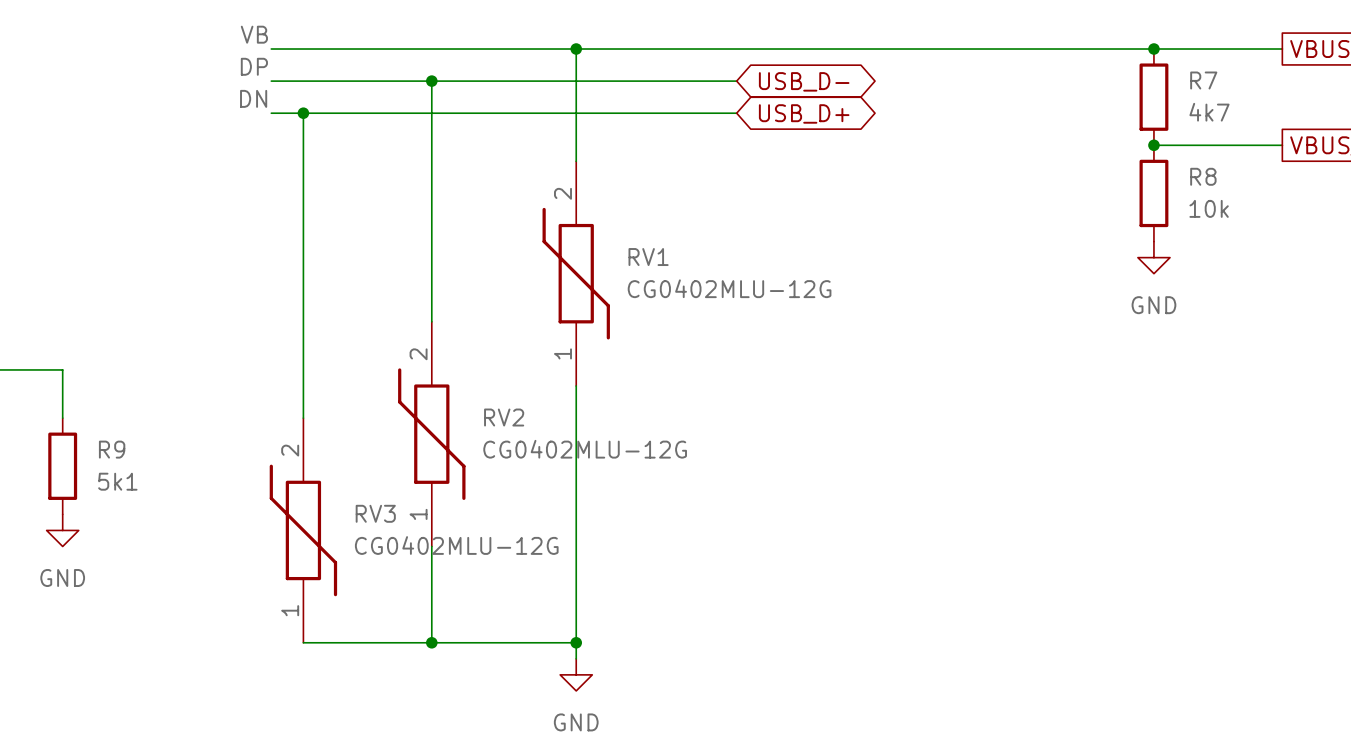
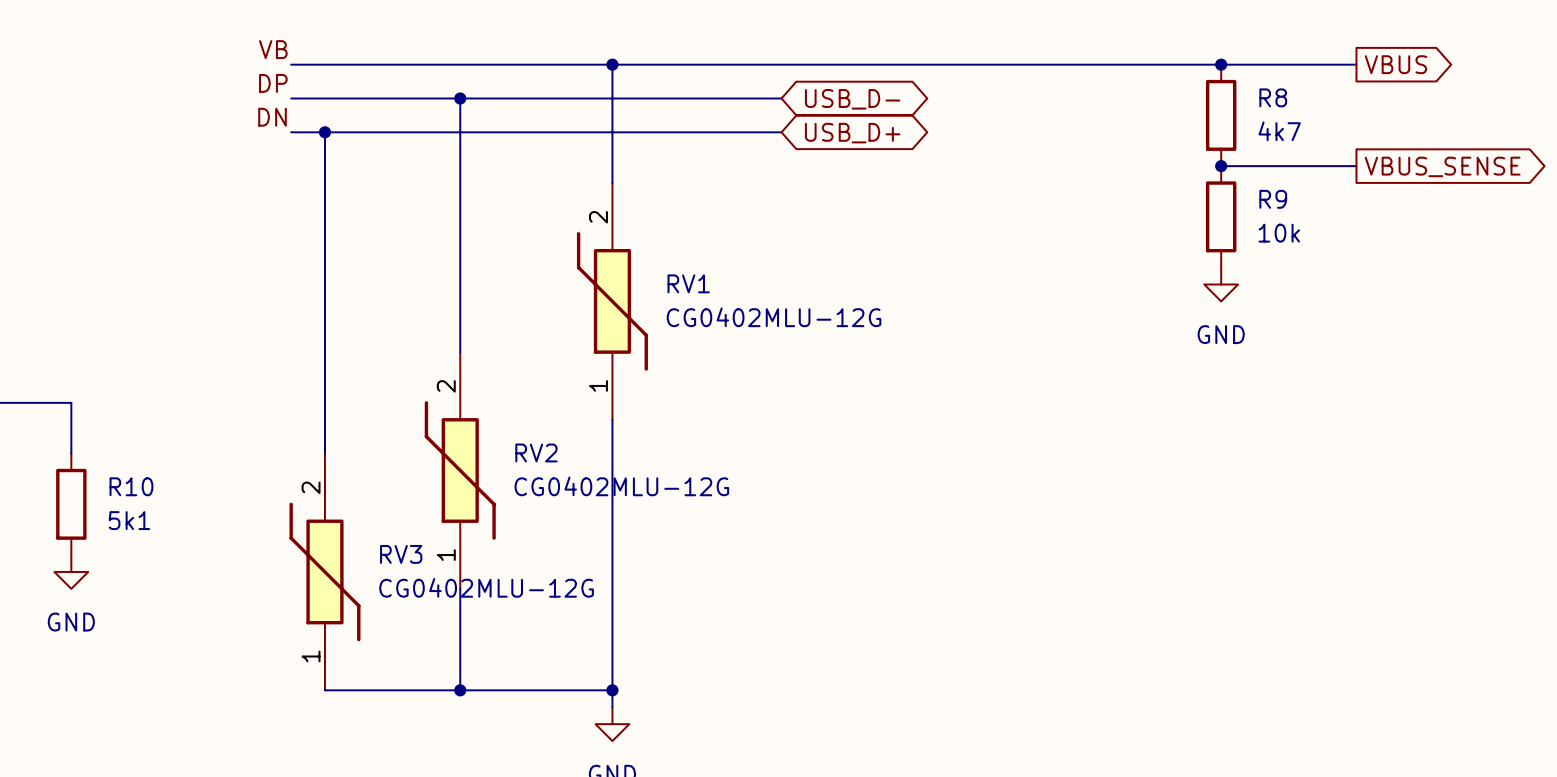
R7 name: R7 (1203, 80) -> R8 (1273, 97)
R8 name: R8 (1203, 176) -> R9 (1273, 199)
R9 name: R9 (112, 449) -> R10 (131, 486)

